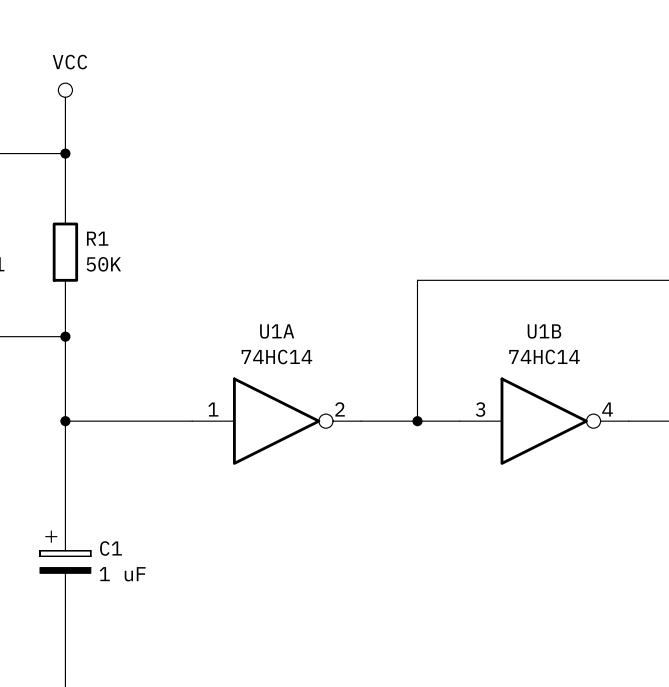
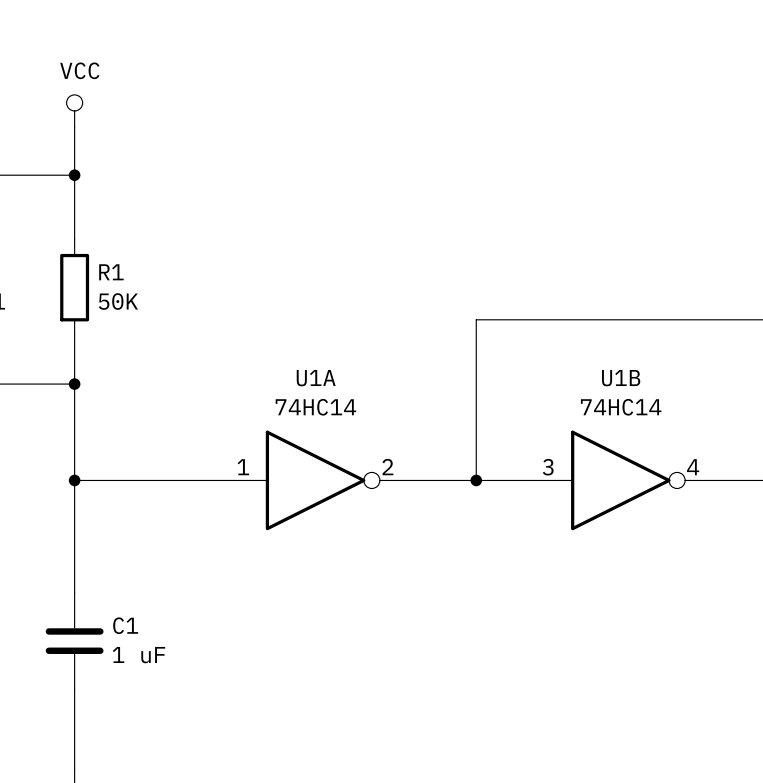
C1 symbol: [40, 519, 91, 605] -> [45, 592, 104, 690]

